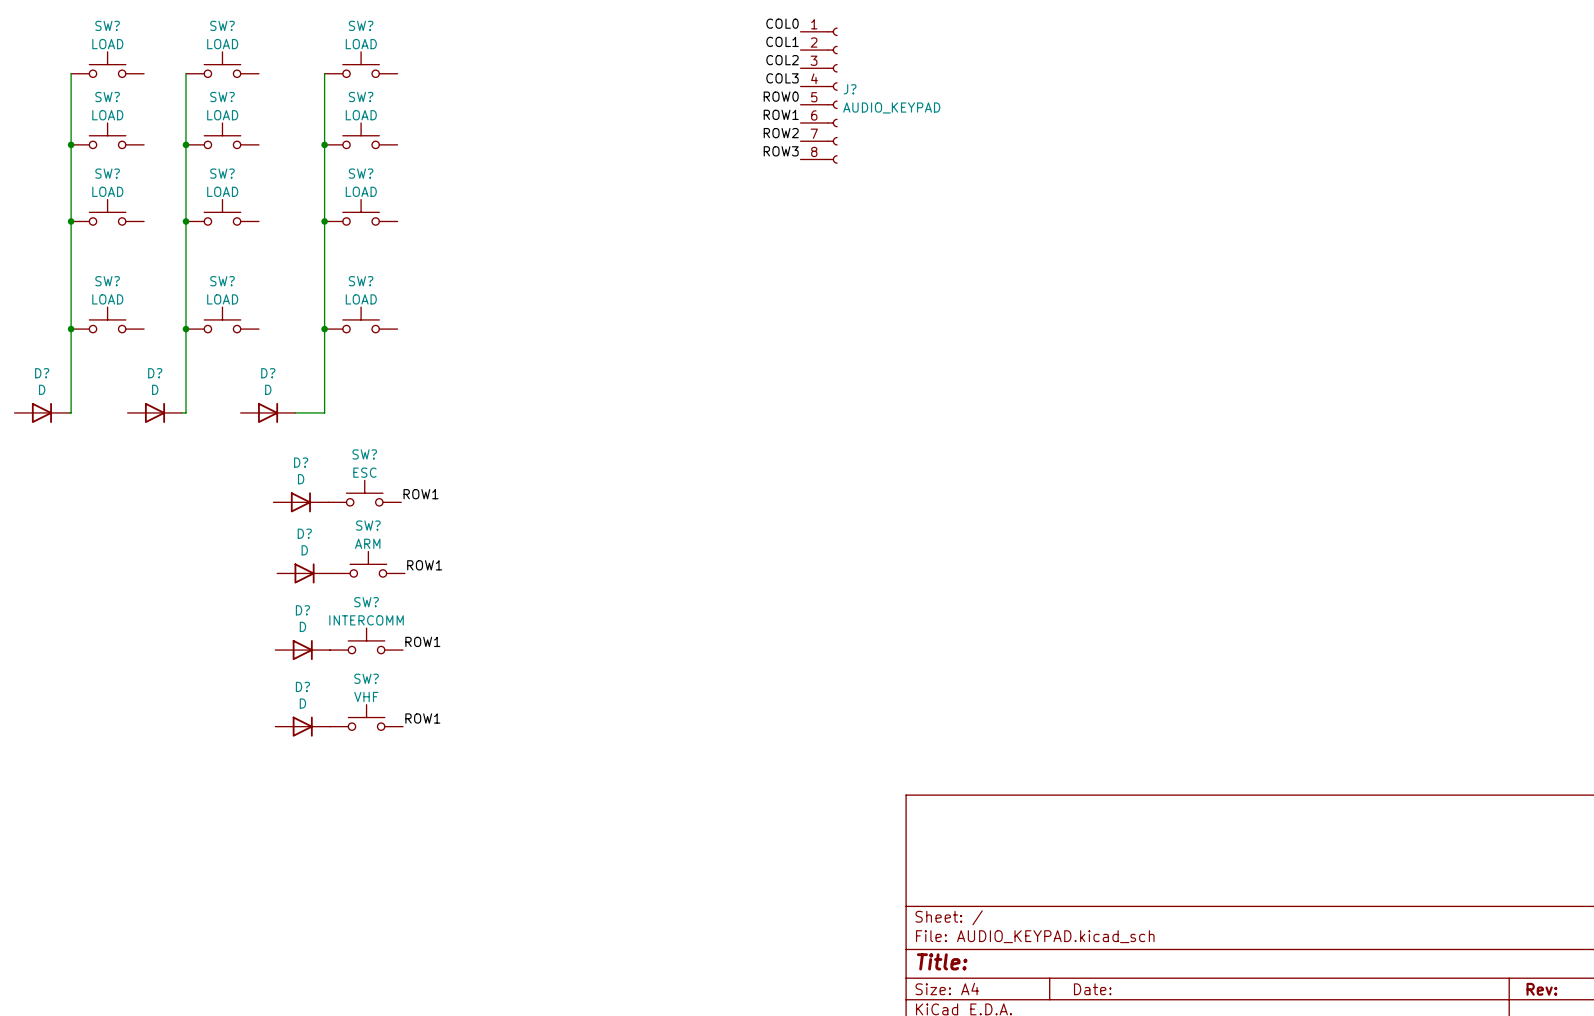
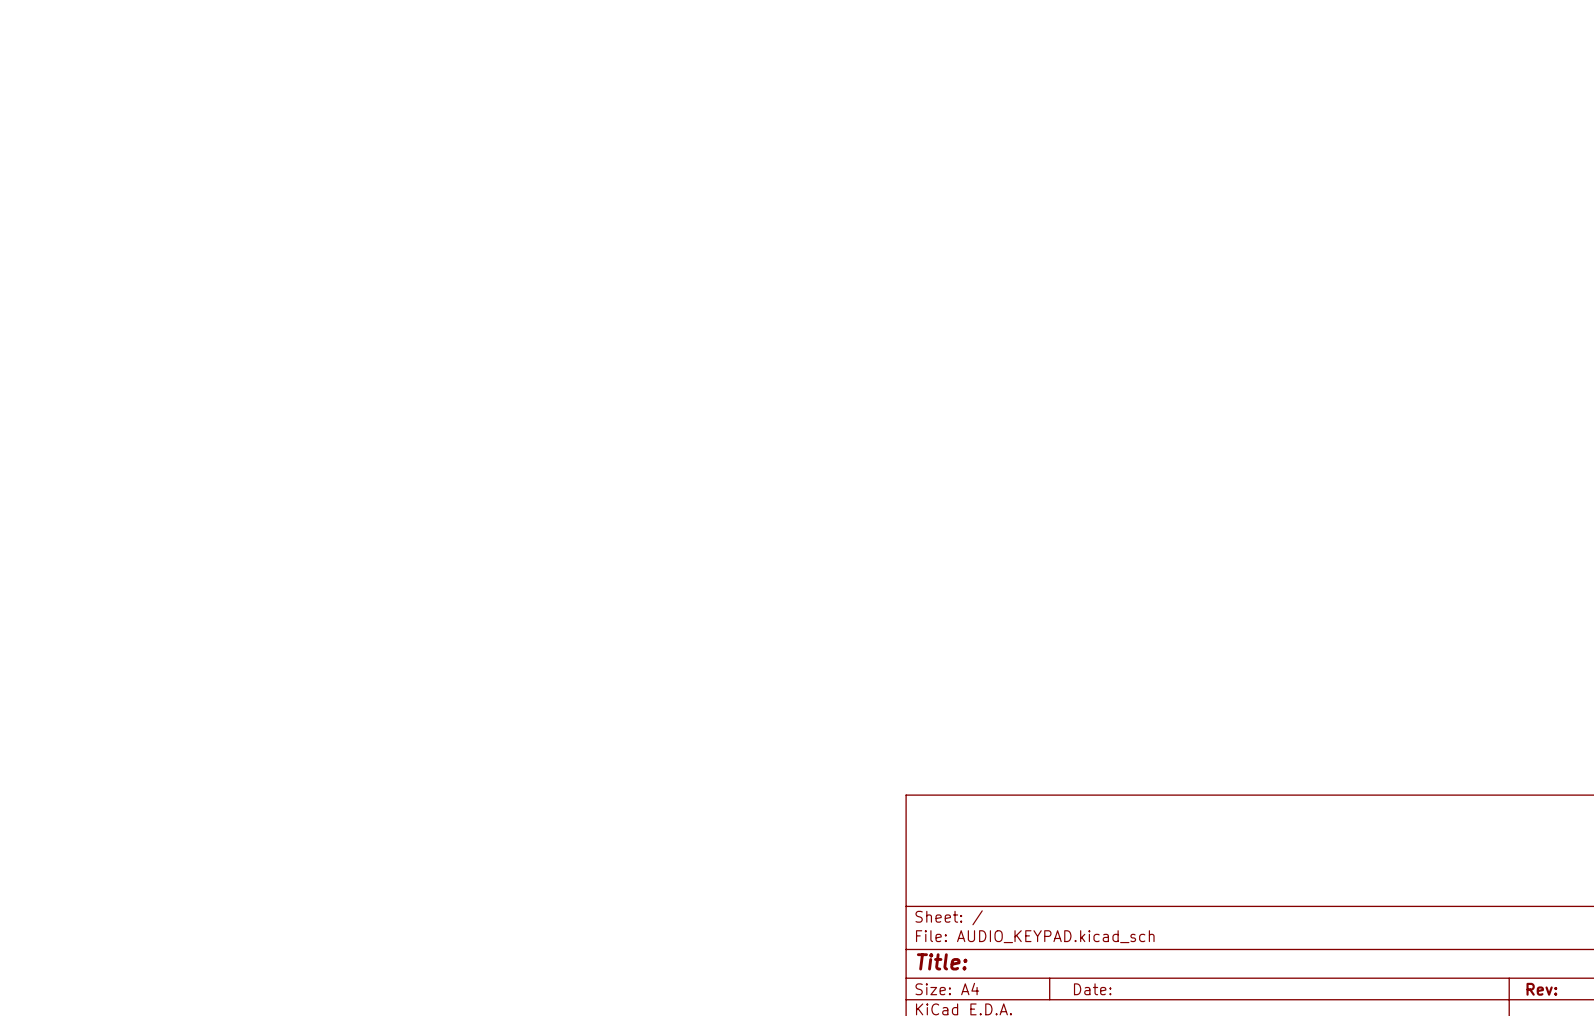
label: COL0 (782, 23) -> none
label: COL1 (782, 41) -> none
label: COL2 (782, 60) -> none
SW?: LOAD (107, 64) -> none
SW?: LOAD (222, 64) -> none
SW?: LOAD (361, 64) -> none
wire: (71, 73) (71, 412) (69, 412) -> none
wire: (186, 73) (186, 412) (182, 412) -> none
wire: (324, 73) (324, 412) (295, 412) -> none
label: COL3 (782, 78) -> none
J?: AUDIO_KEYPAD (819, 95) -> none
label: ROW0 (781, 96) -> none
label: ROW1 (781, 114) -> none
label: ROW2 (781, 133) -> none
SW?: LOAD (107, 135) -> none
SW?: LOAD (222, 135) -> none
SW?: LOAD (361, 135) -> none
junction: (71, 144) -> none
junction: (186, 144) -> none
junction: (324, 144) -> none
label: ROW3 (781, 151) -> none
SW?: LOAD (107, 212) -> none
SW?: LOAD (222, 212) -> none
SW?: LOAD (361, 212) -> none
junction: (71, 221) -> none
junction: (186, 221) -> none
junction: (324, 221) -> none
SW?: LOAD (107, 319) -> none
SW?: LOAD (222, 319) -> none
SW?: LOAD (361, 319) -> none
junction: (71, 329) -> none
junction: (186, 329) -> none
junction: (324, 329) -> none
D?: D (41, 412) -> none
D?: D (155, 412) -> none
D?: D (268, 412) -> none
SW?: ESC (364, 493) -> none
label: ROW1 (421, 494) -> none
D?: D (300, 502) -> none
SW?: ARM (368, 564) -> none
label: ROW1 (424, 565) -> none
D?: D (304, 573) -> none
SW?: INTERCOMM (366, 640) -> none
label: ROW1 (422, 641) -> none
D?: D (302, 650) -> none
SW?: VHF (366, 717) -> none
label: ROW1 (422, 718) -> none
D?: D (302, 726) -> none

